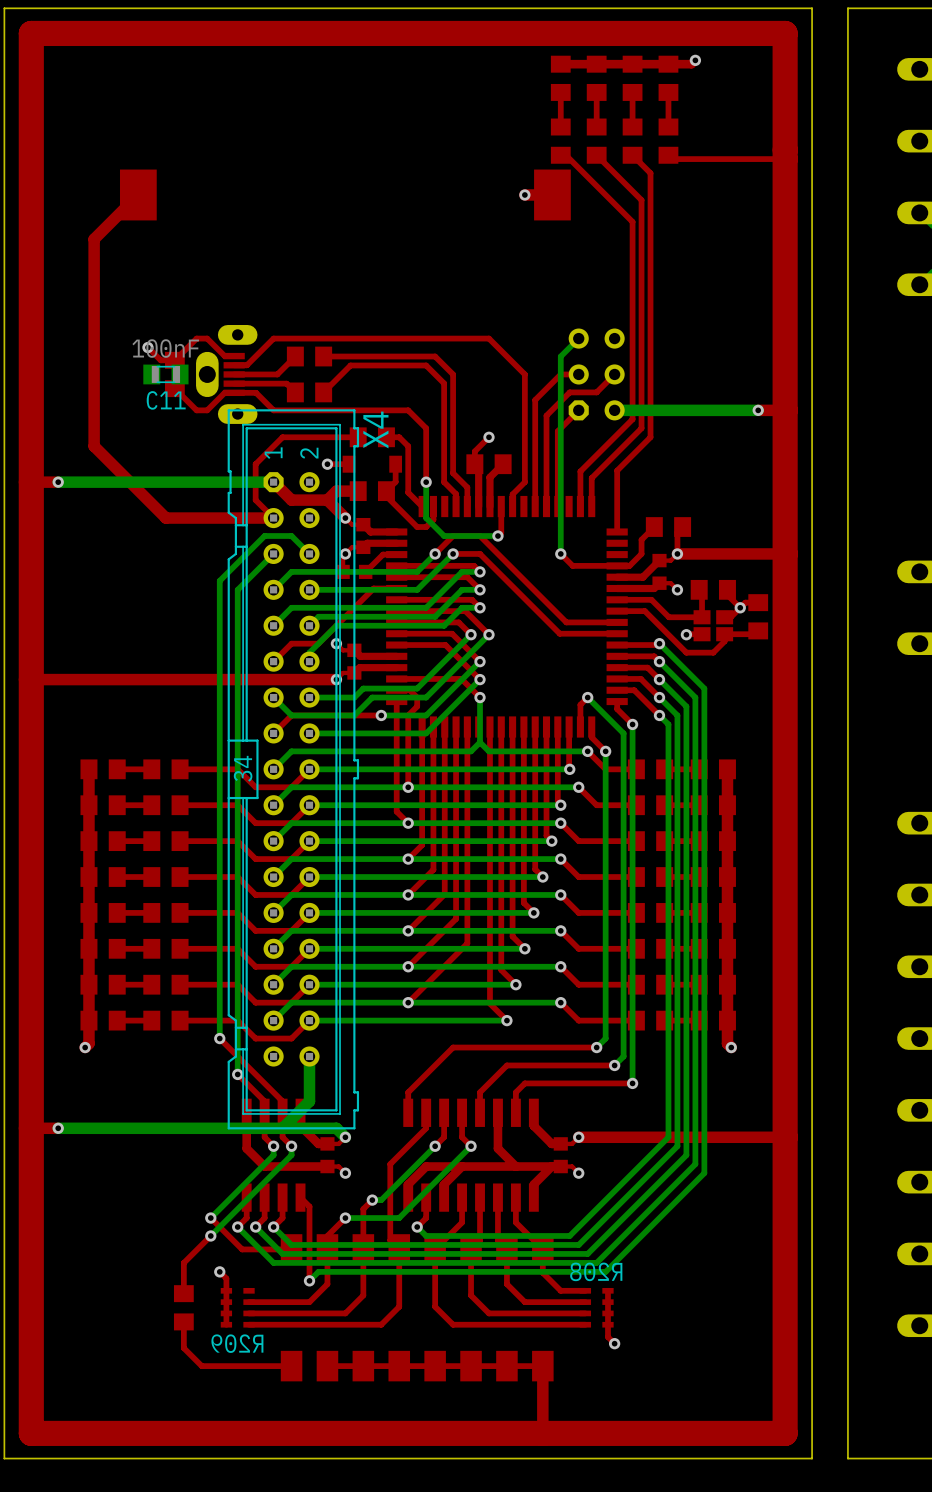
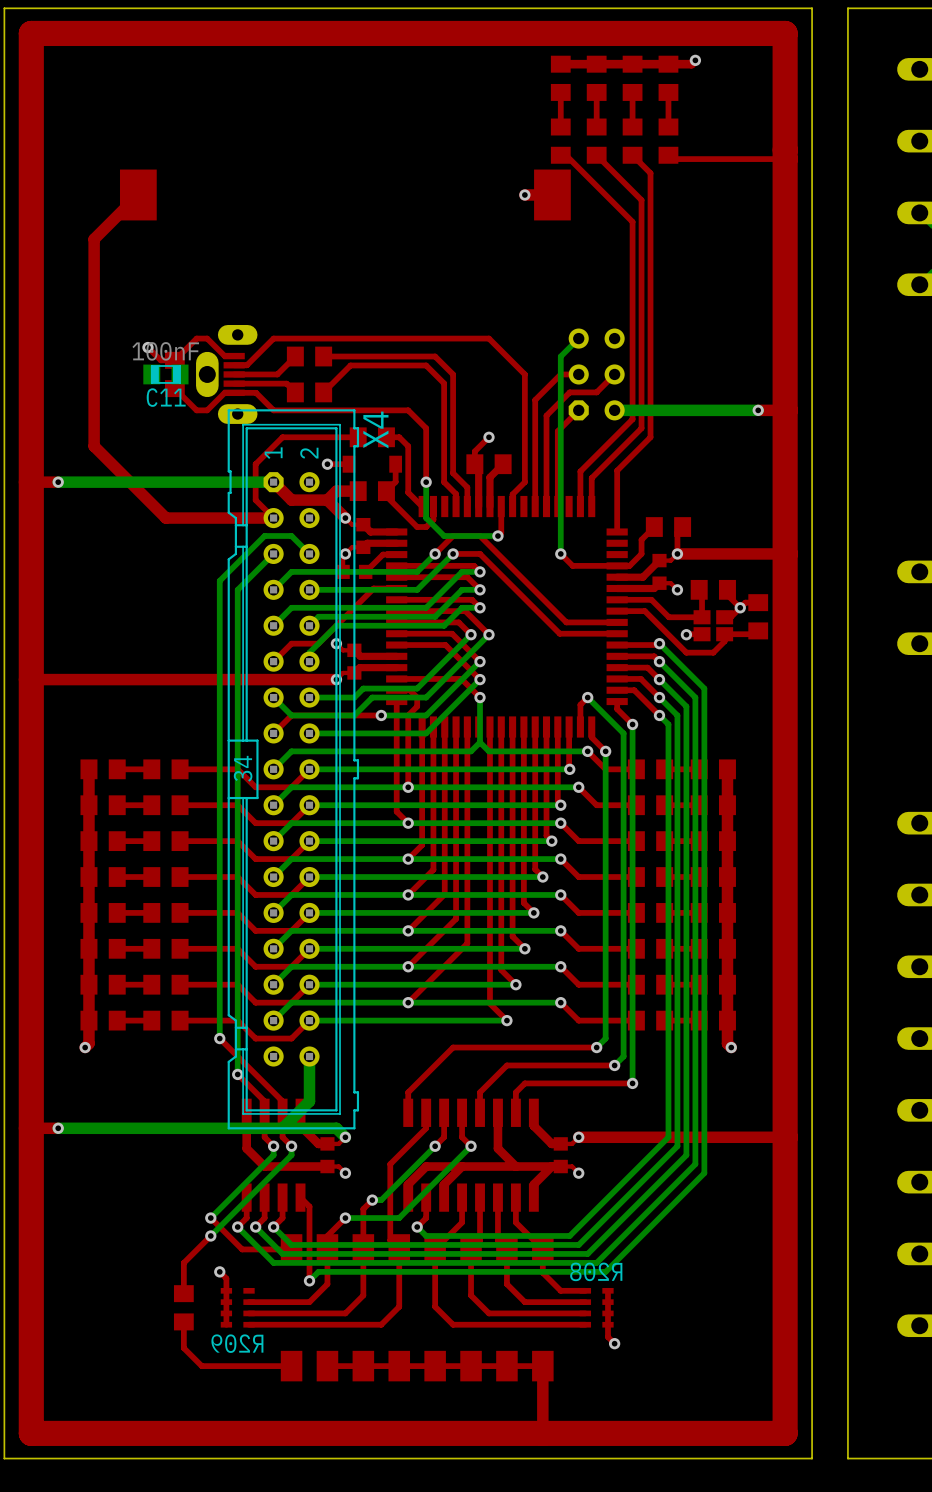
C11 footprint: [143, 364, 189, 385] -> [143, 364, 189, 385]

